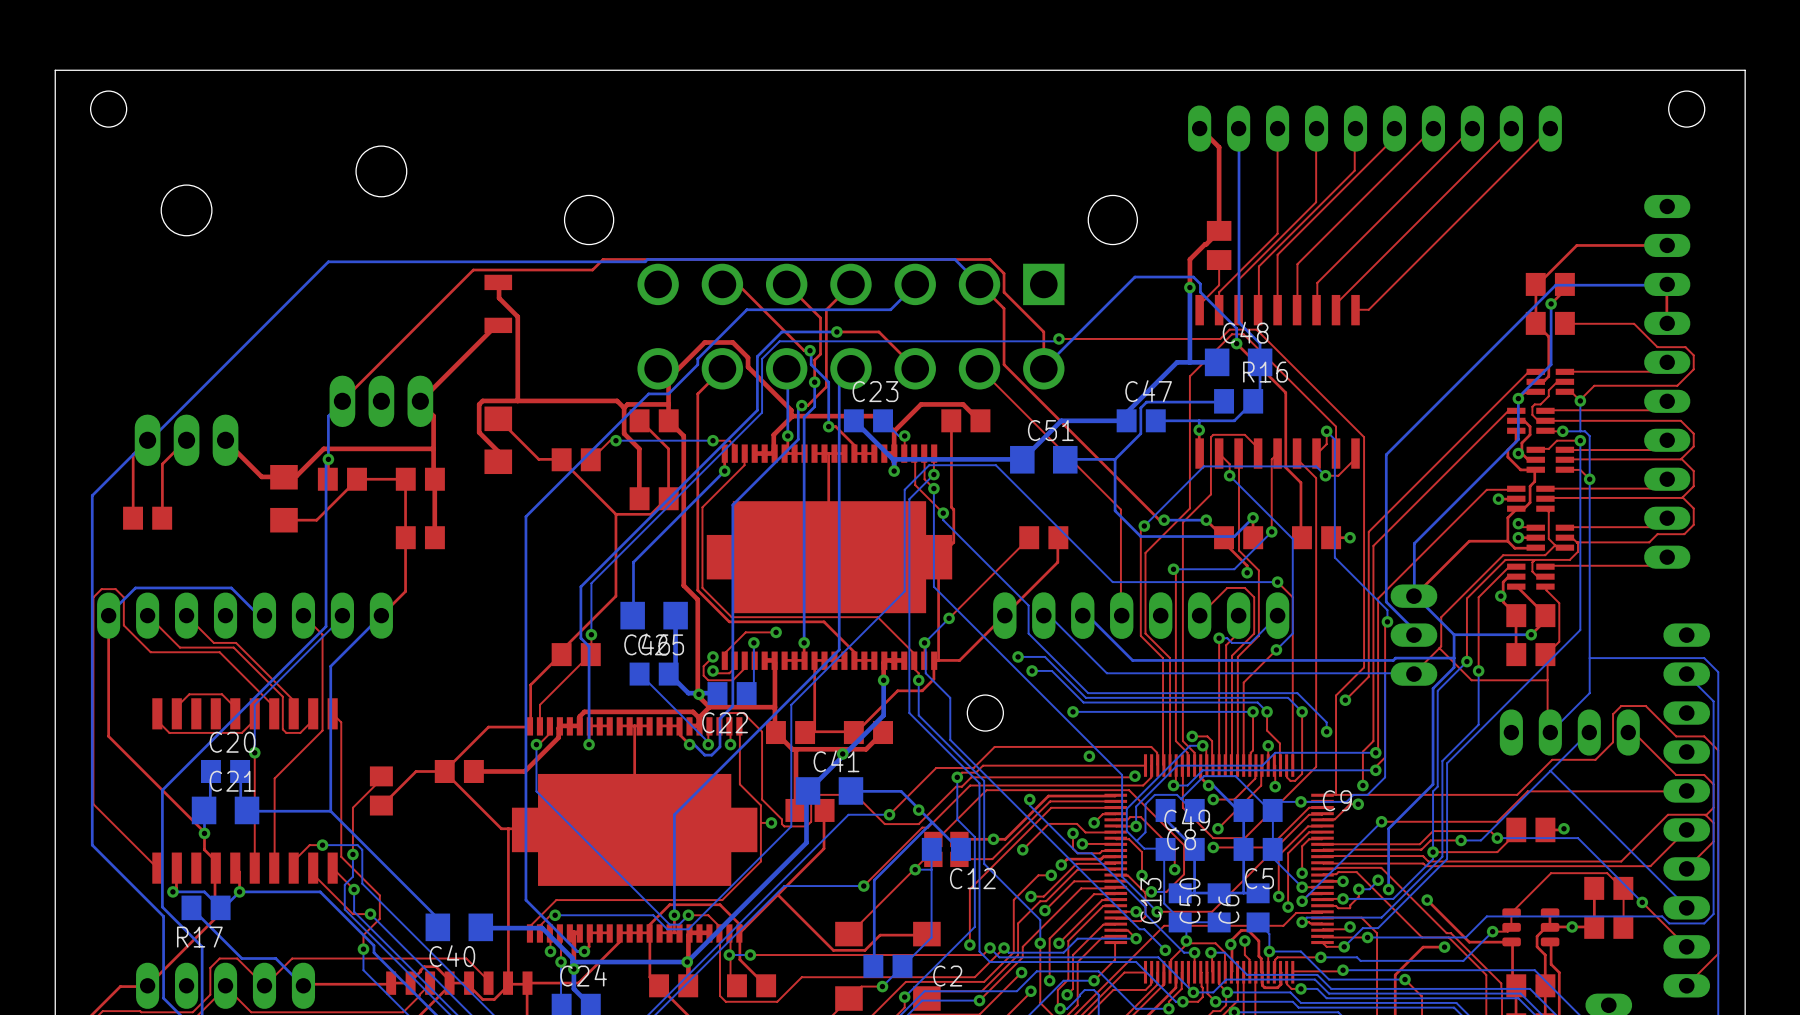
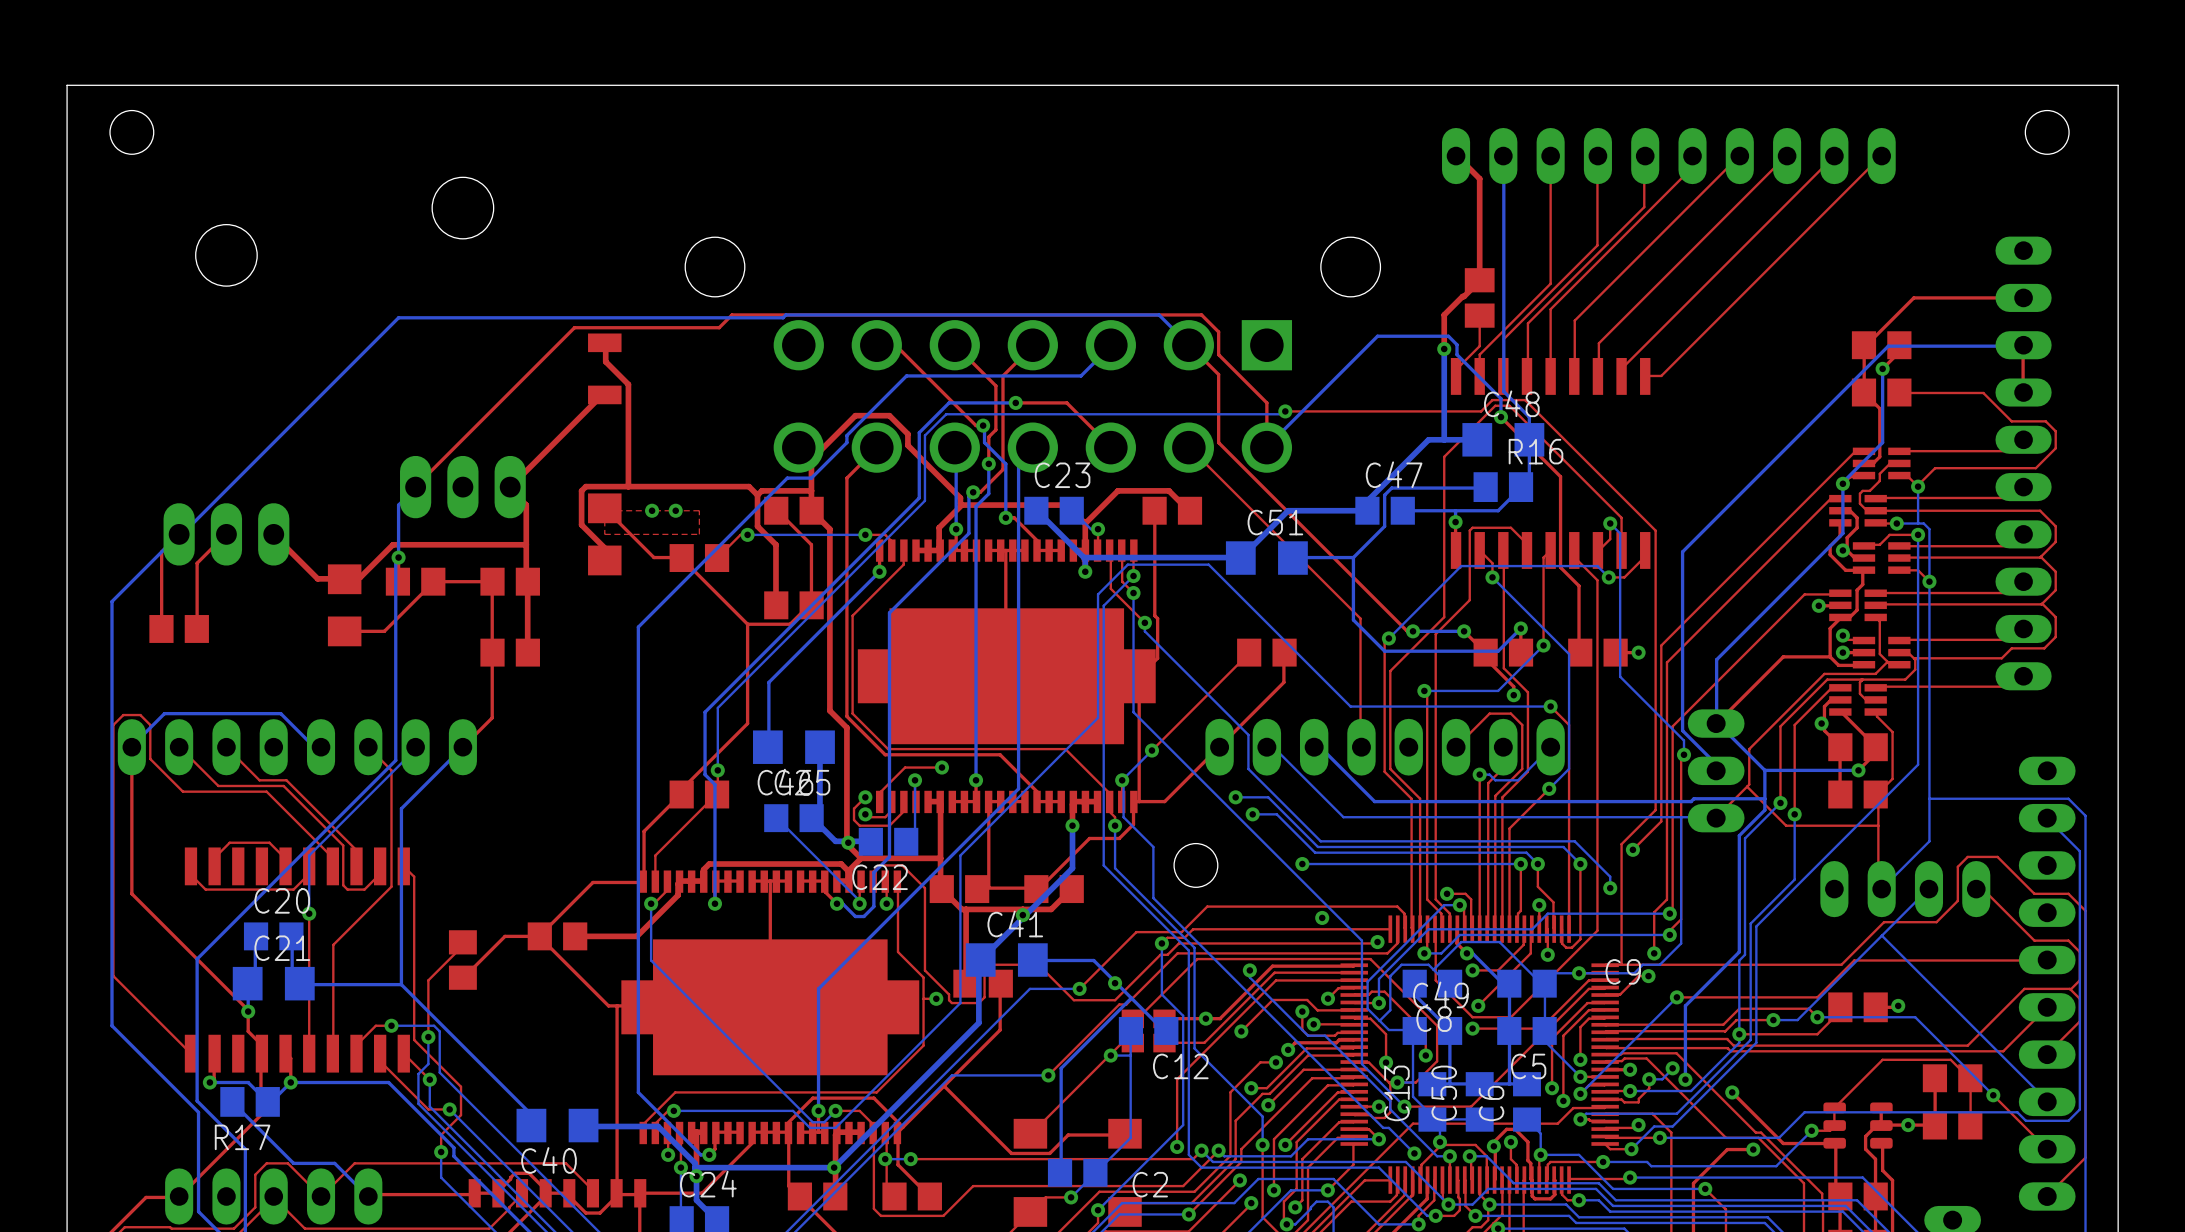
via: none -> (652, 510)
via: none -> (675, 510)
top zone outline: none -> (699, 510) (604, 510) (604, 534) (699, 534) (699, 510)

